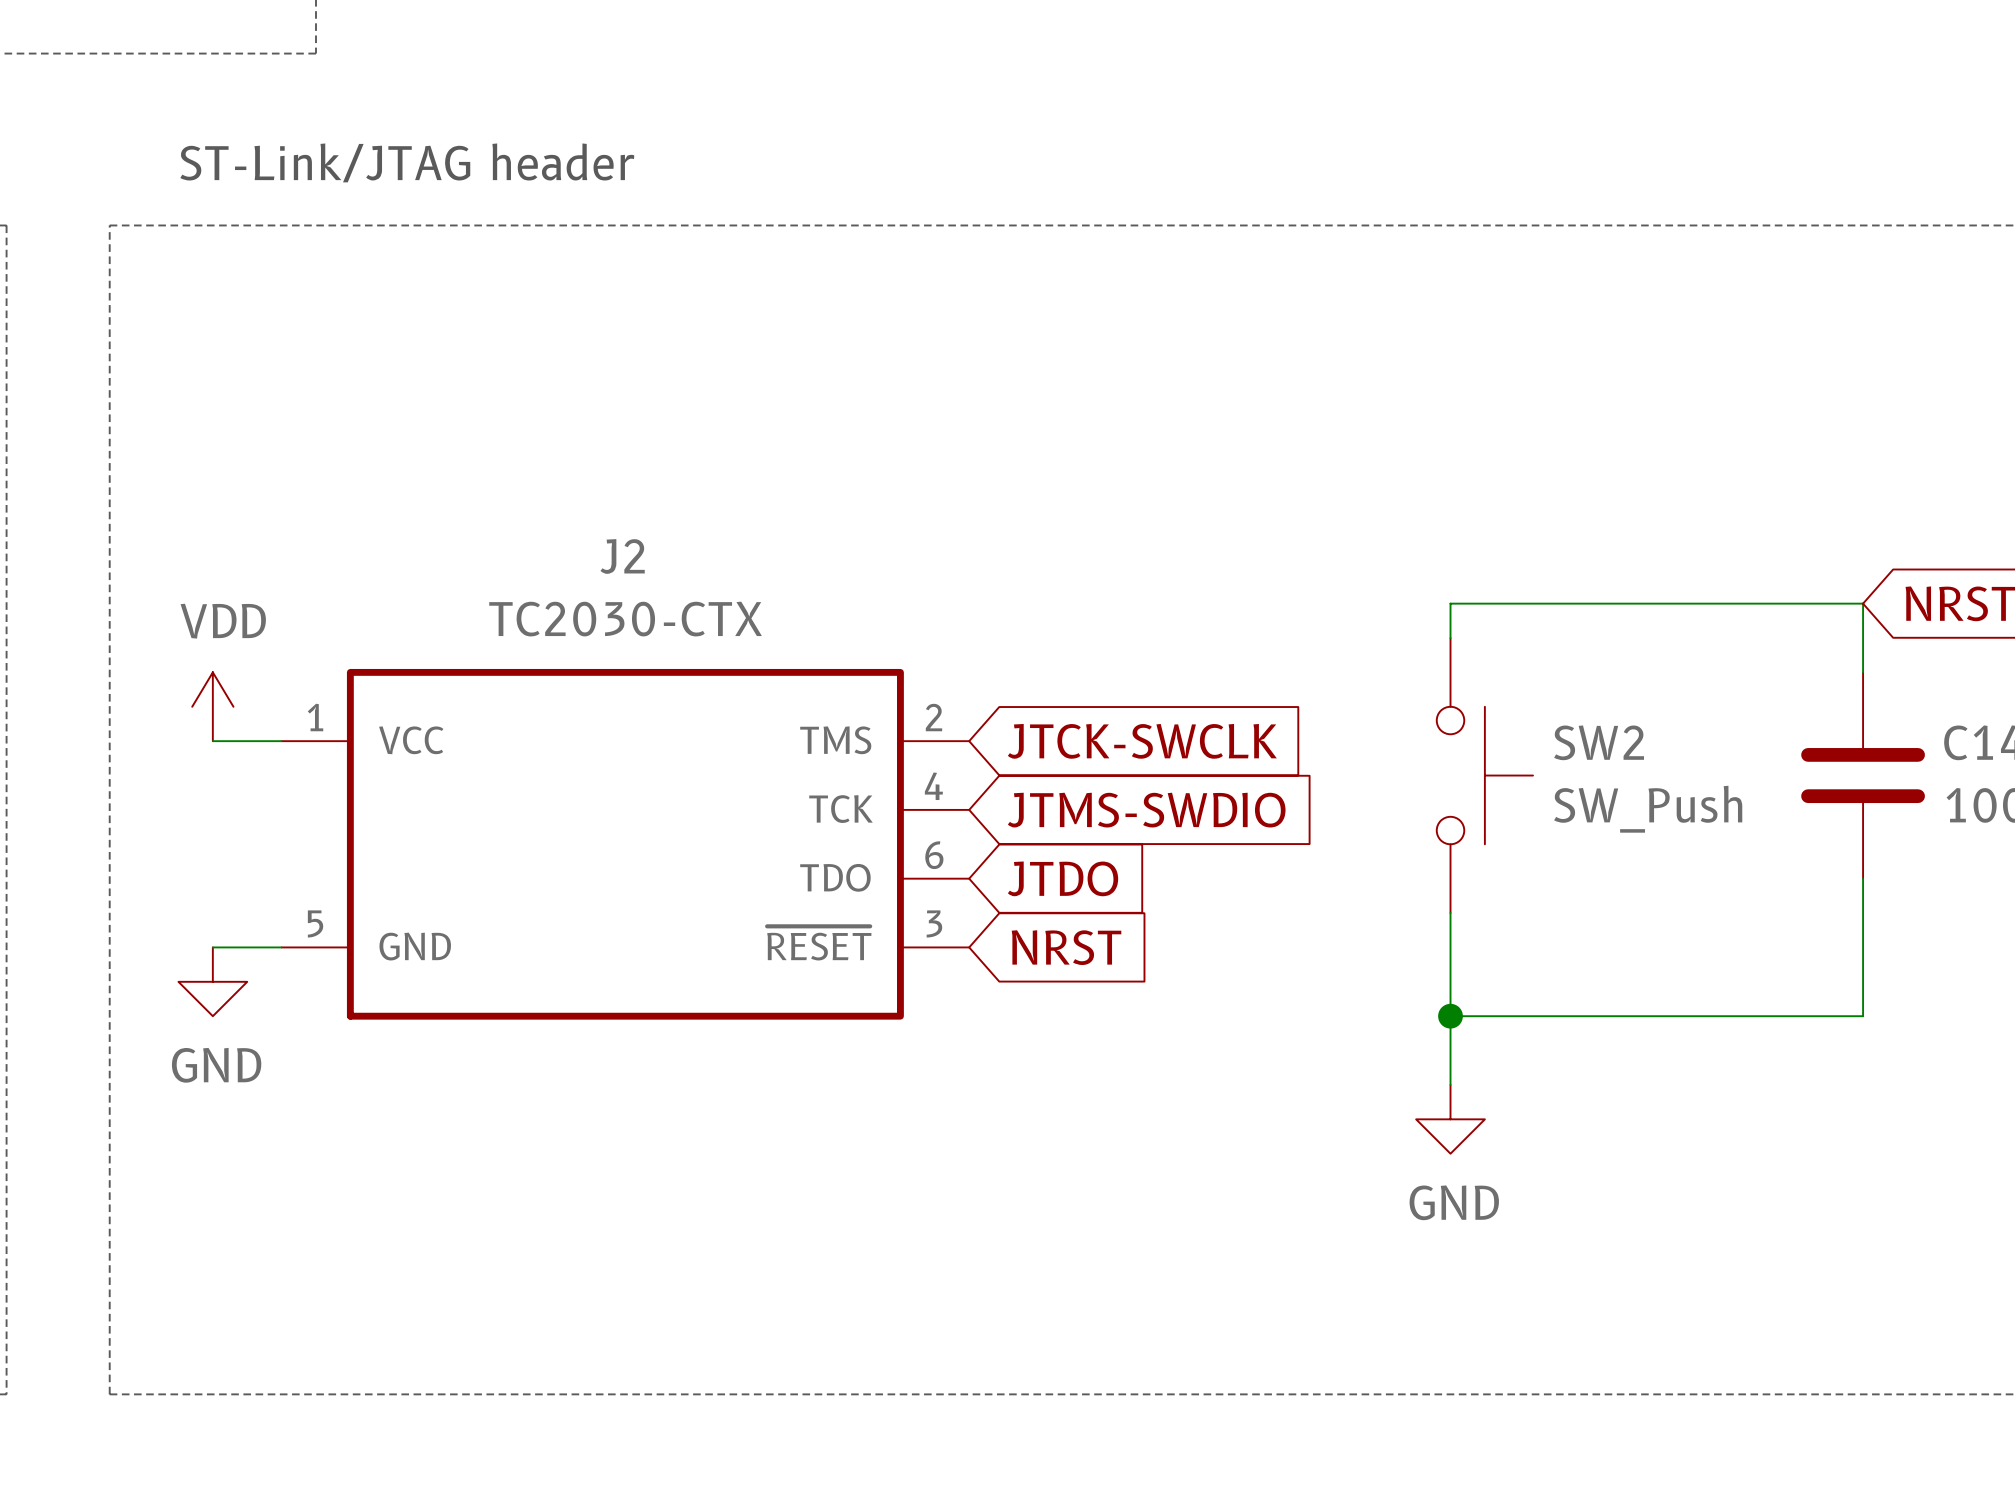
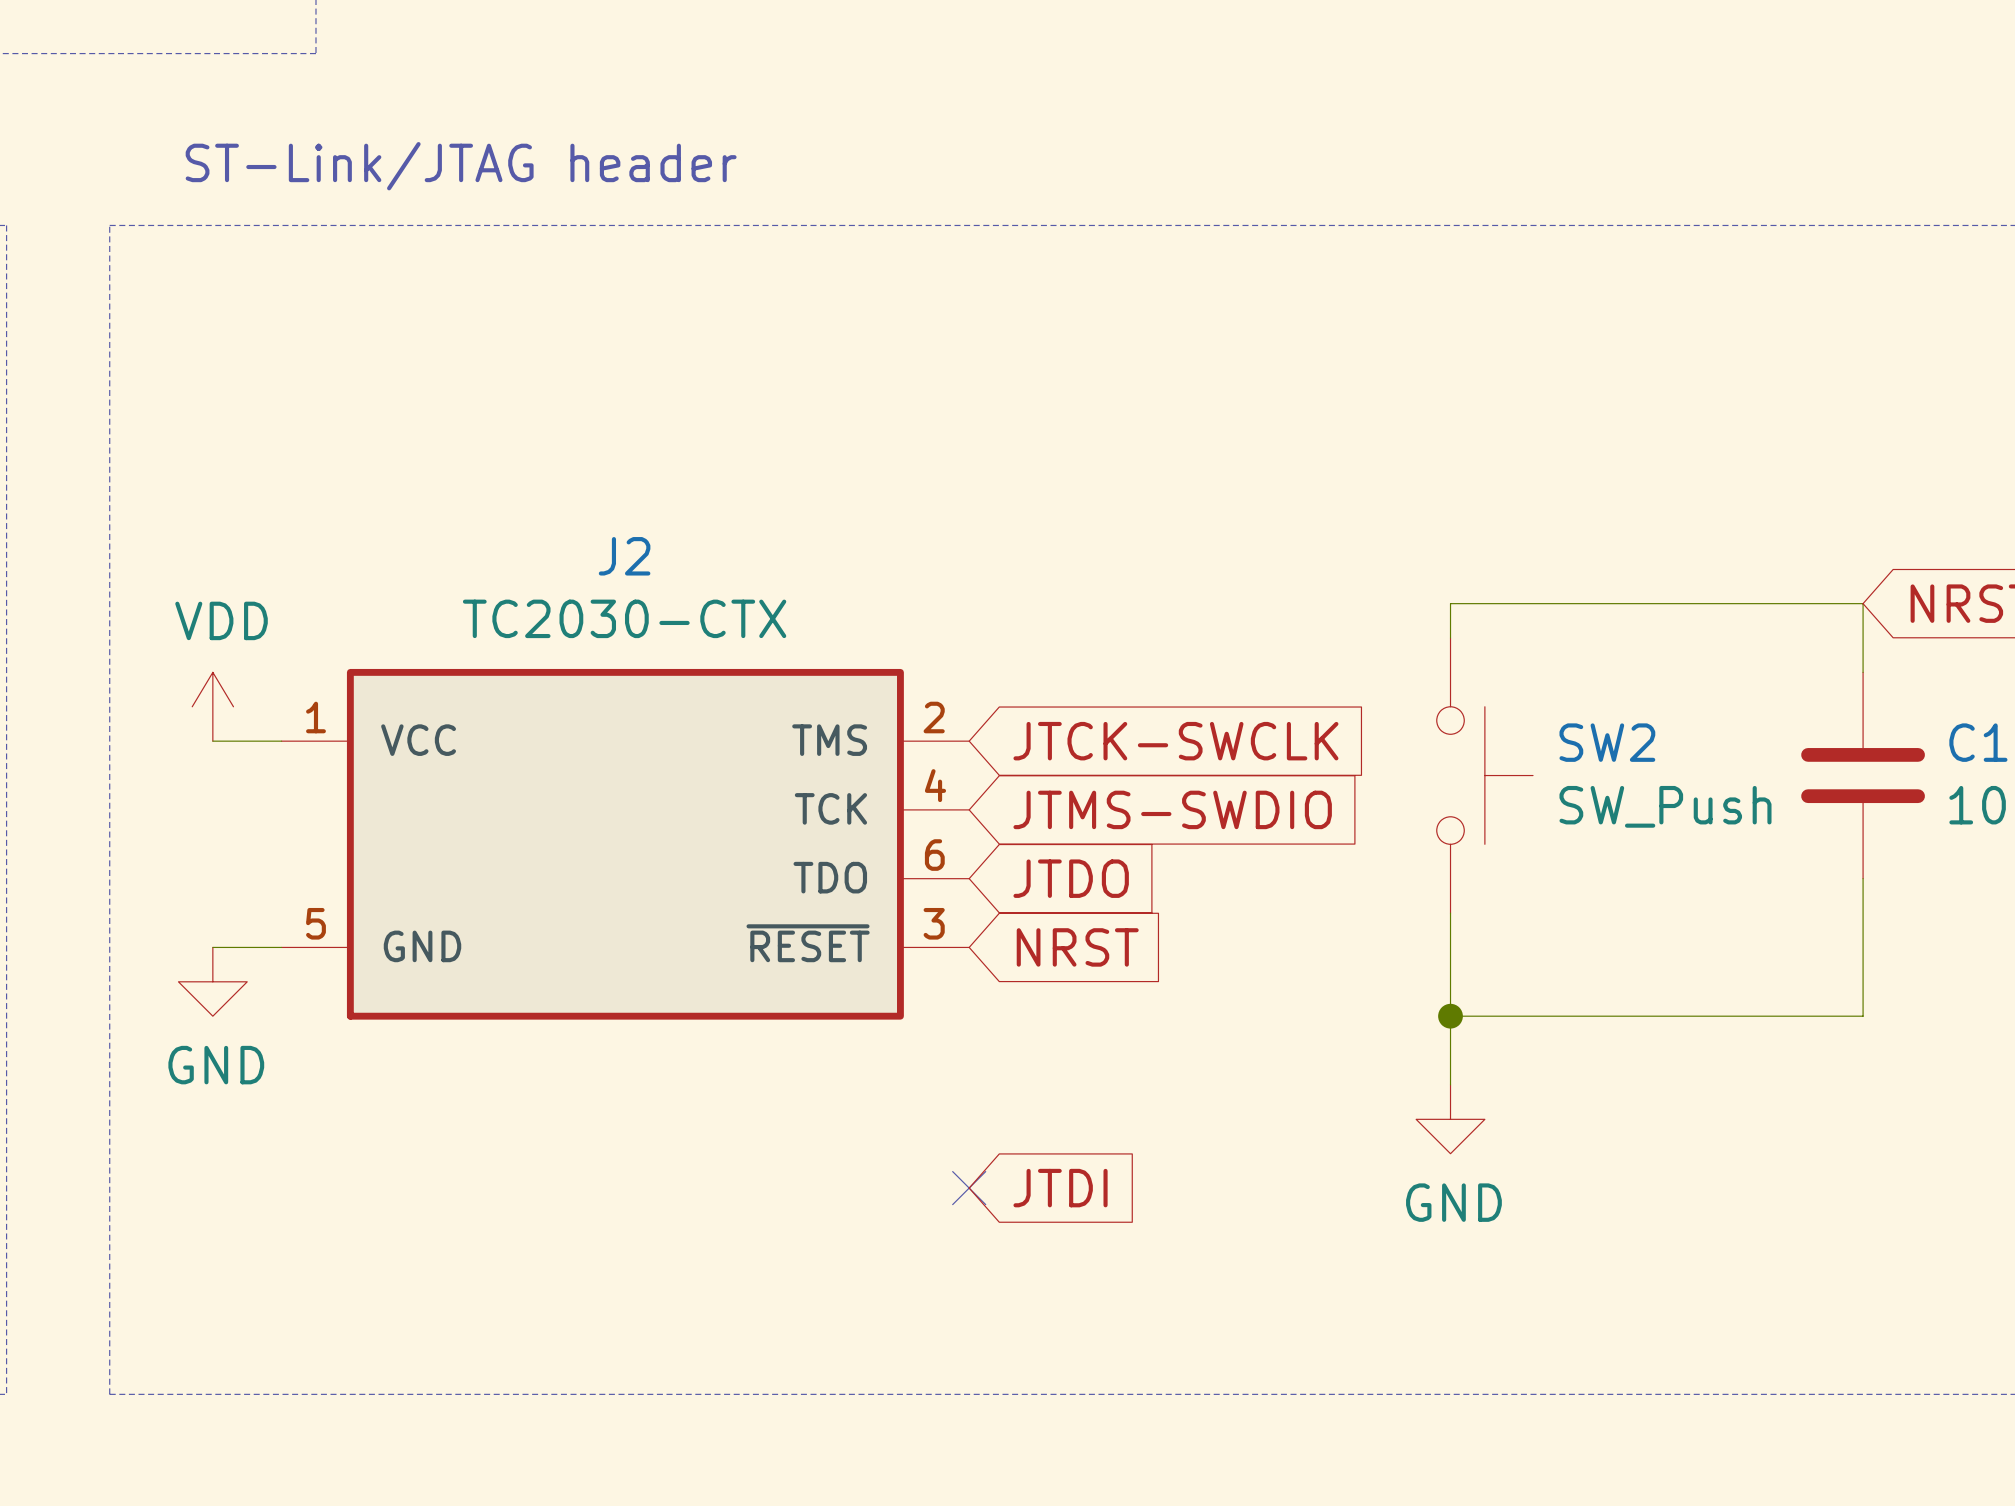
no-connect mark: none -> (969, 1188)
global label: none -> JTDI (1060, 1188)

